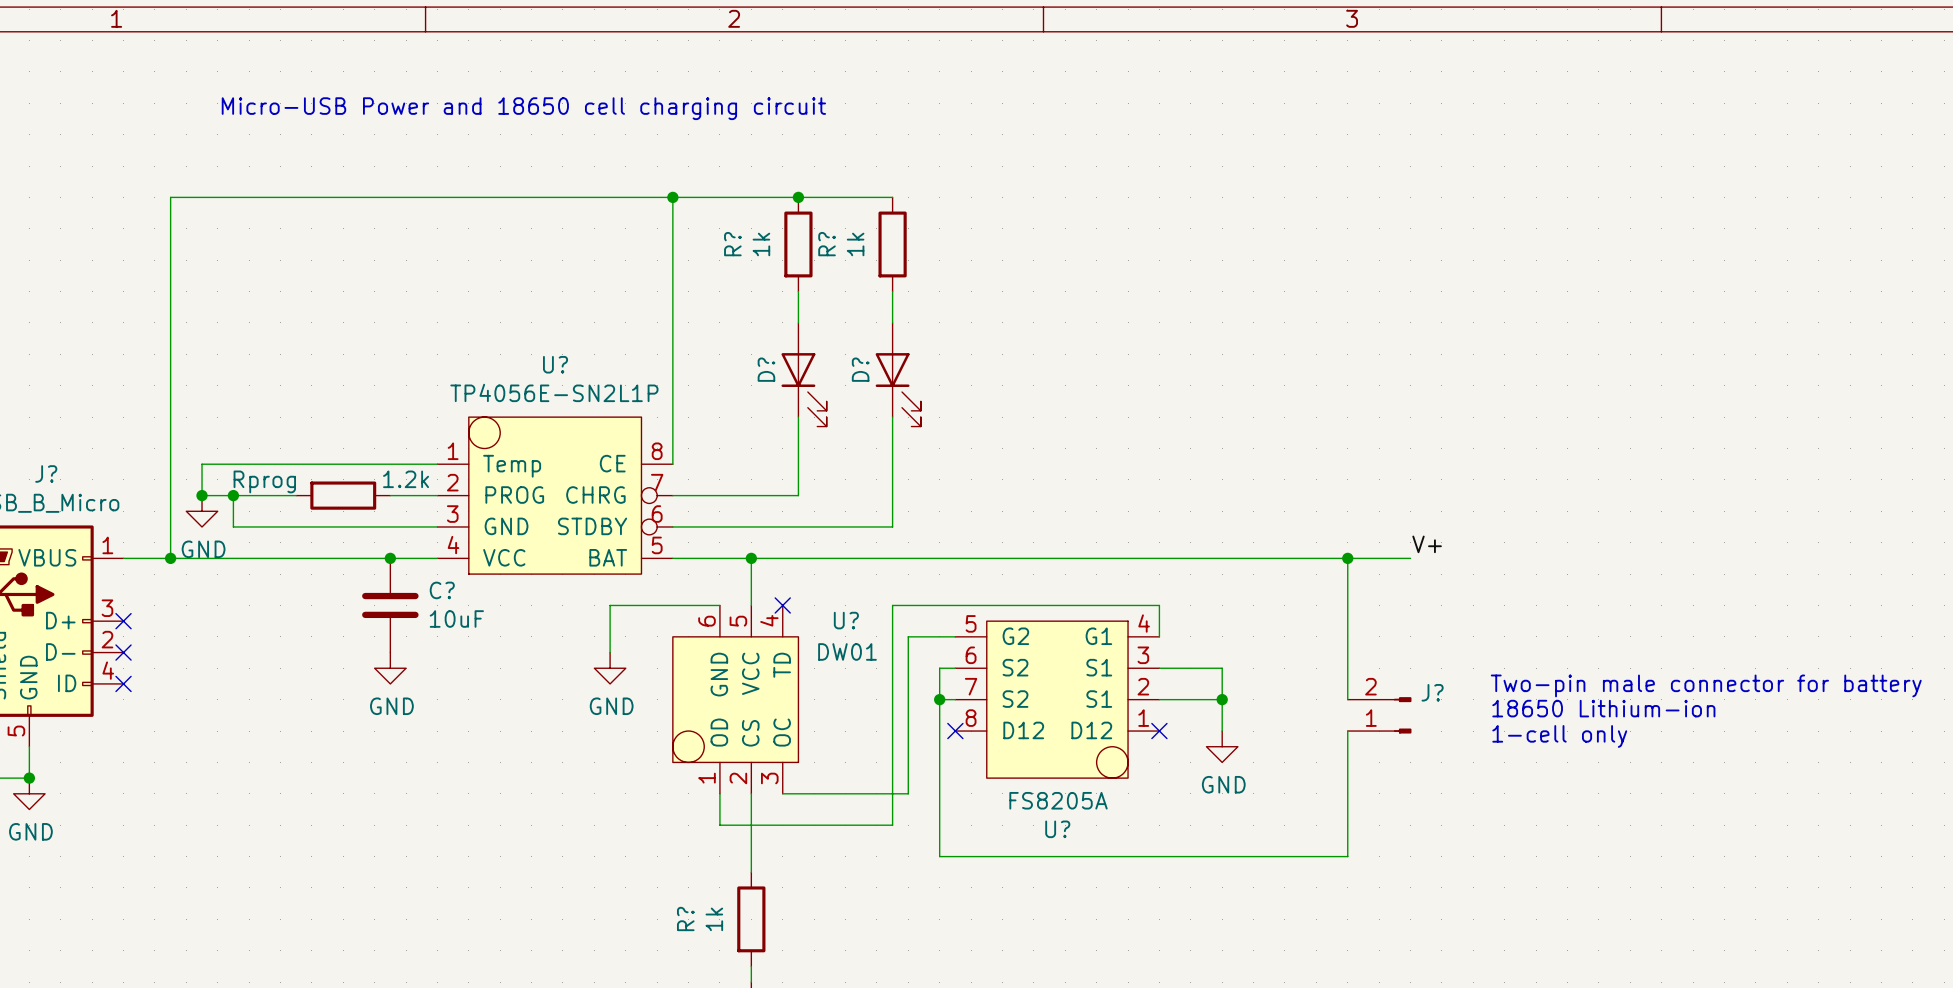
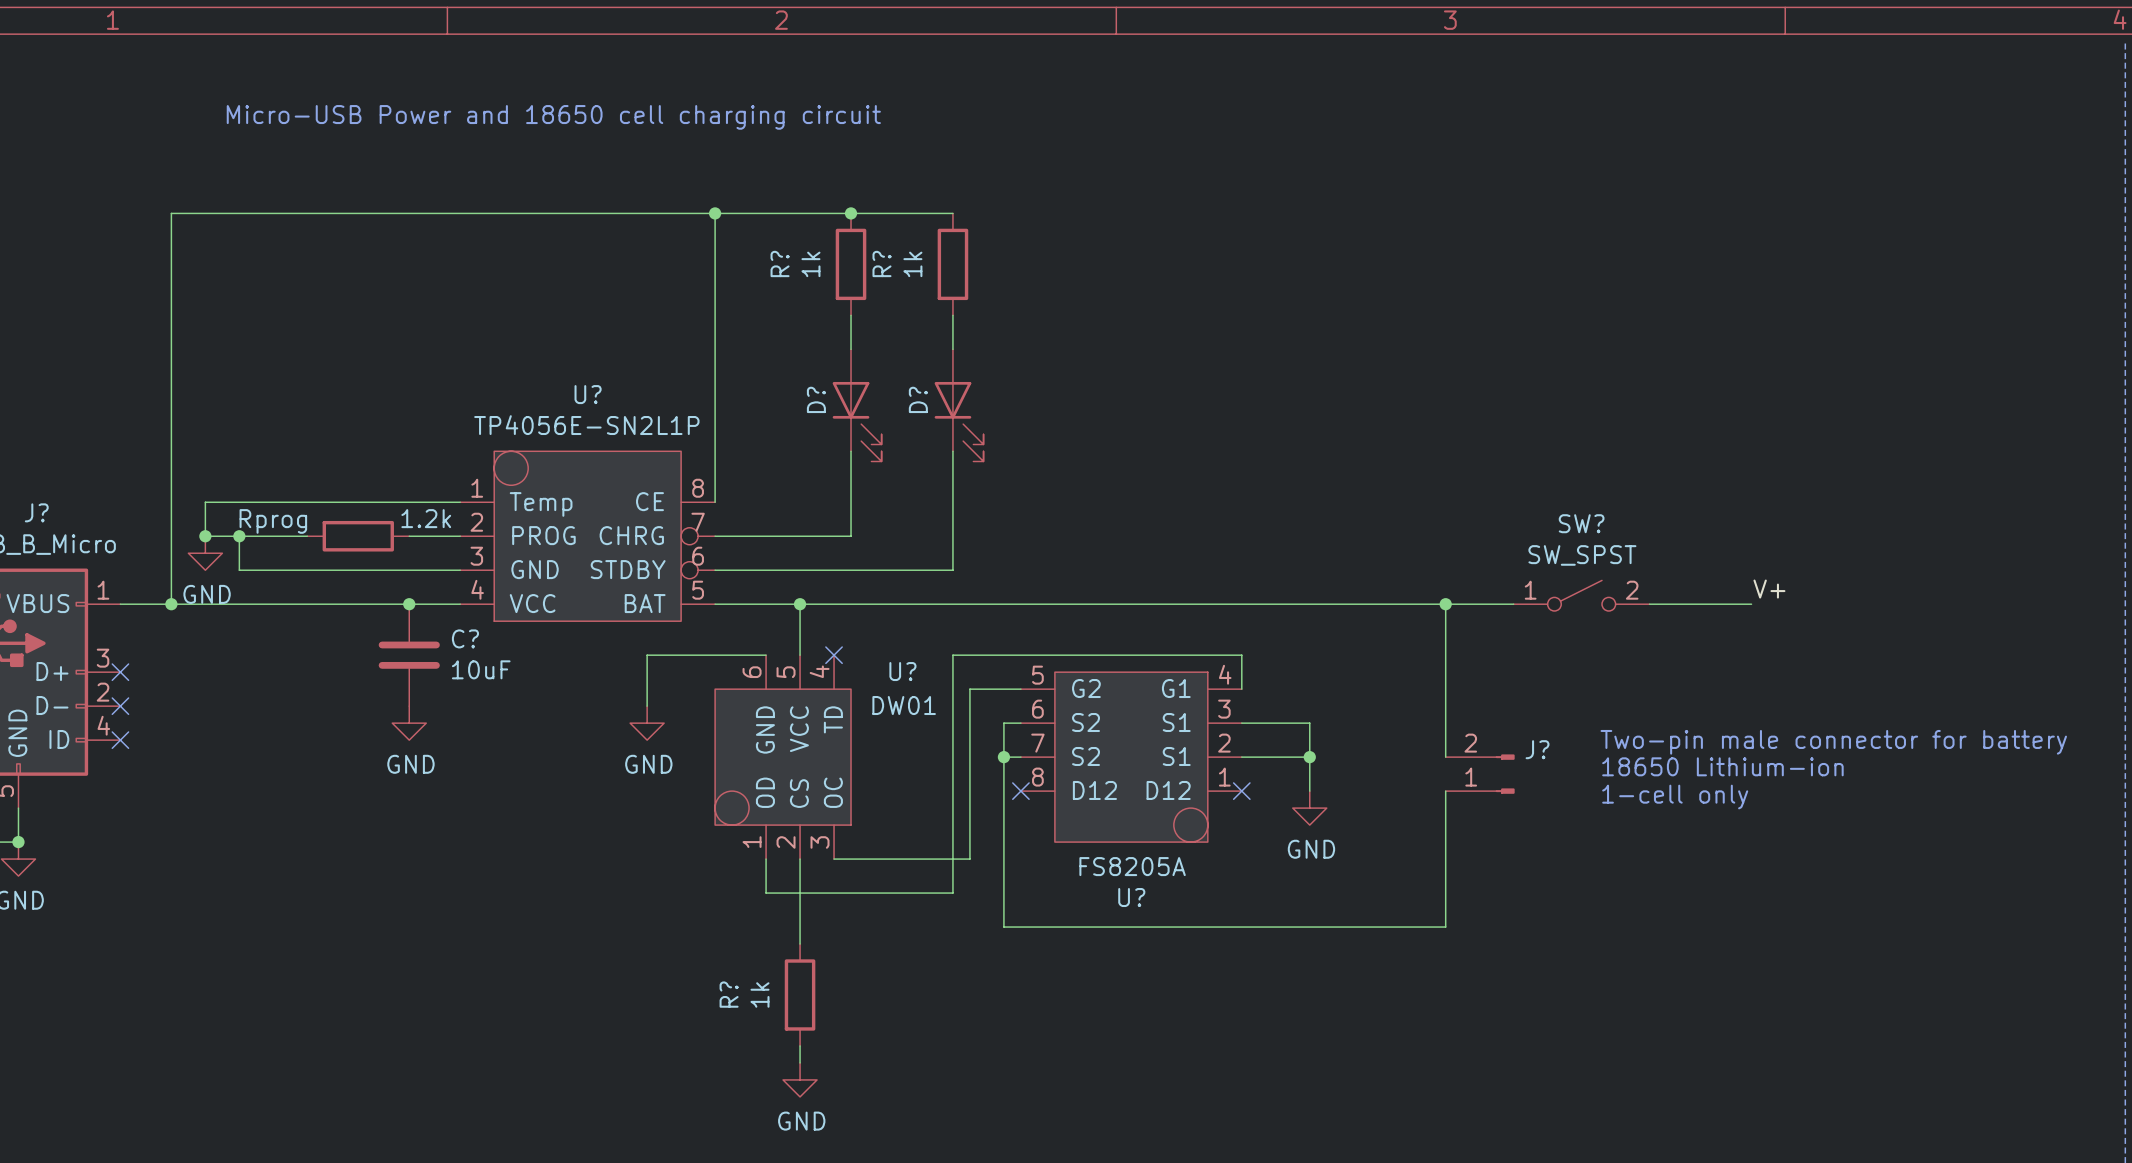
label position: V+ (1427, 544) -> V+ (1769, 589)
SW?: none -> SW_SPST (1581, 595)
wire: none -> (1649, 604) (1751, 604)

